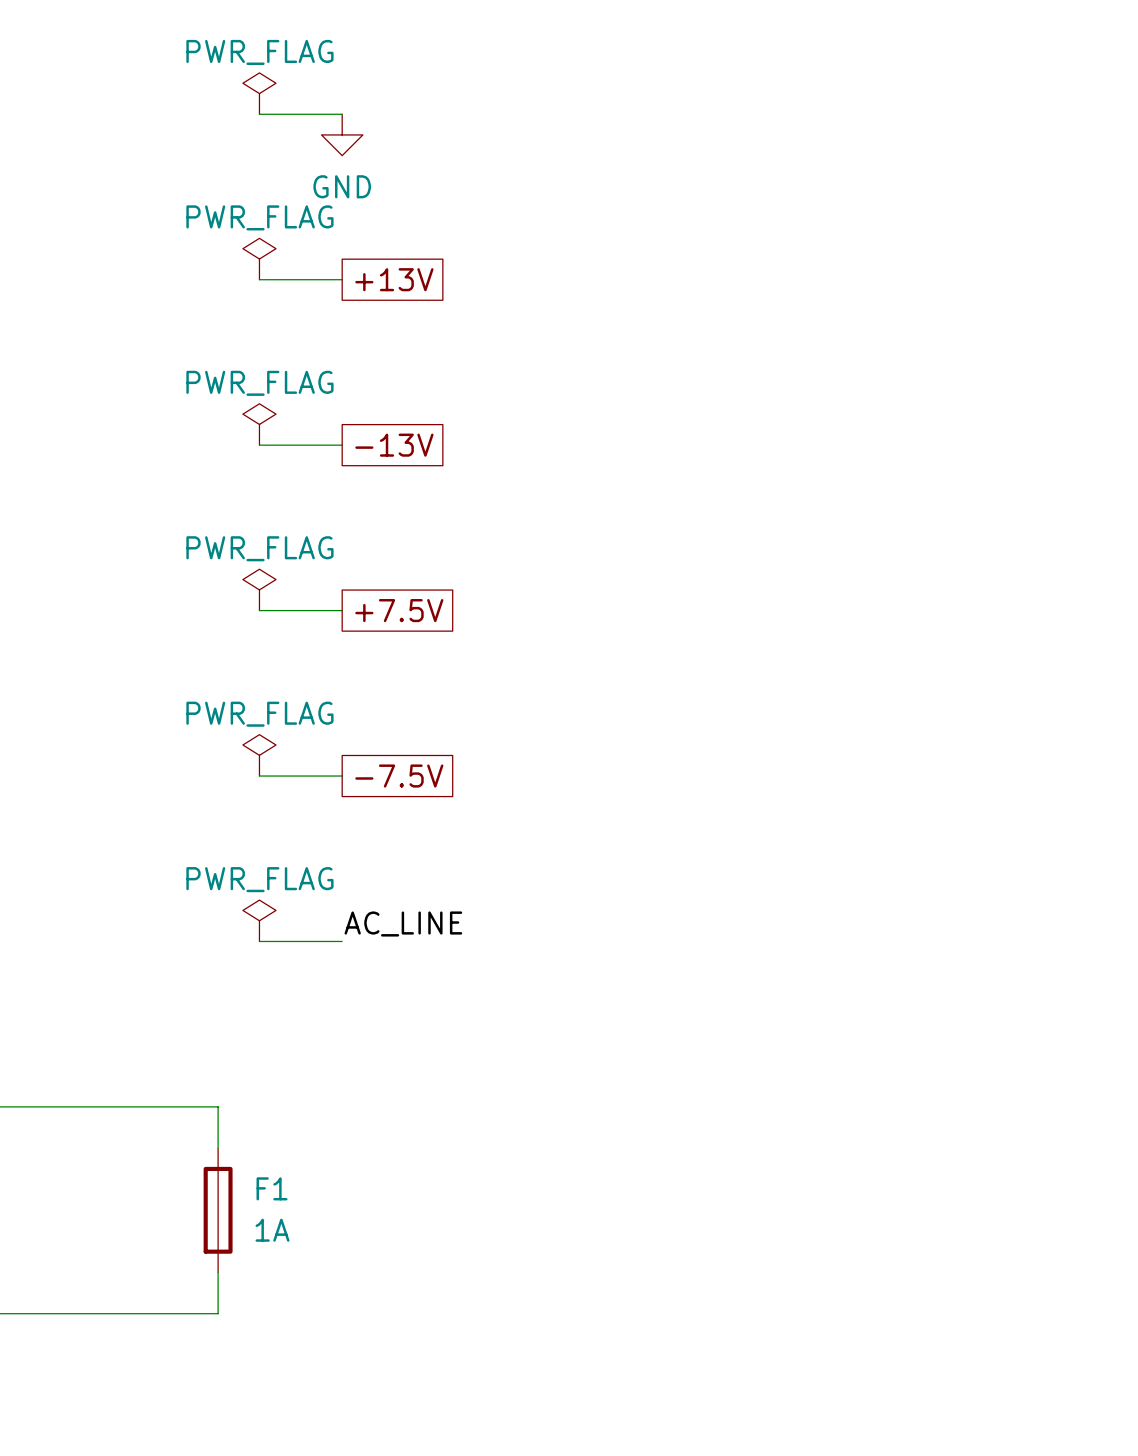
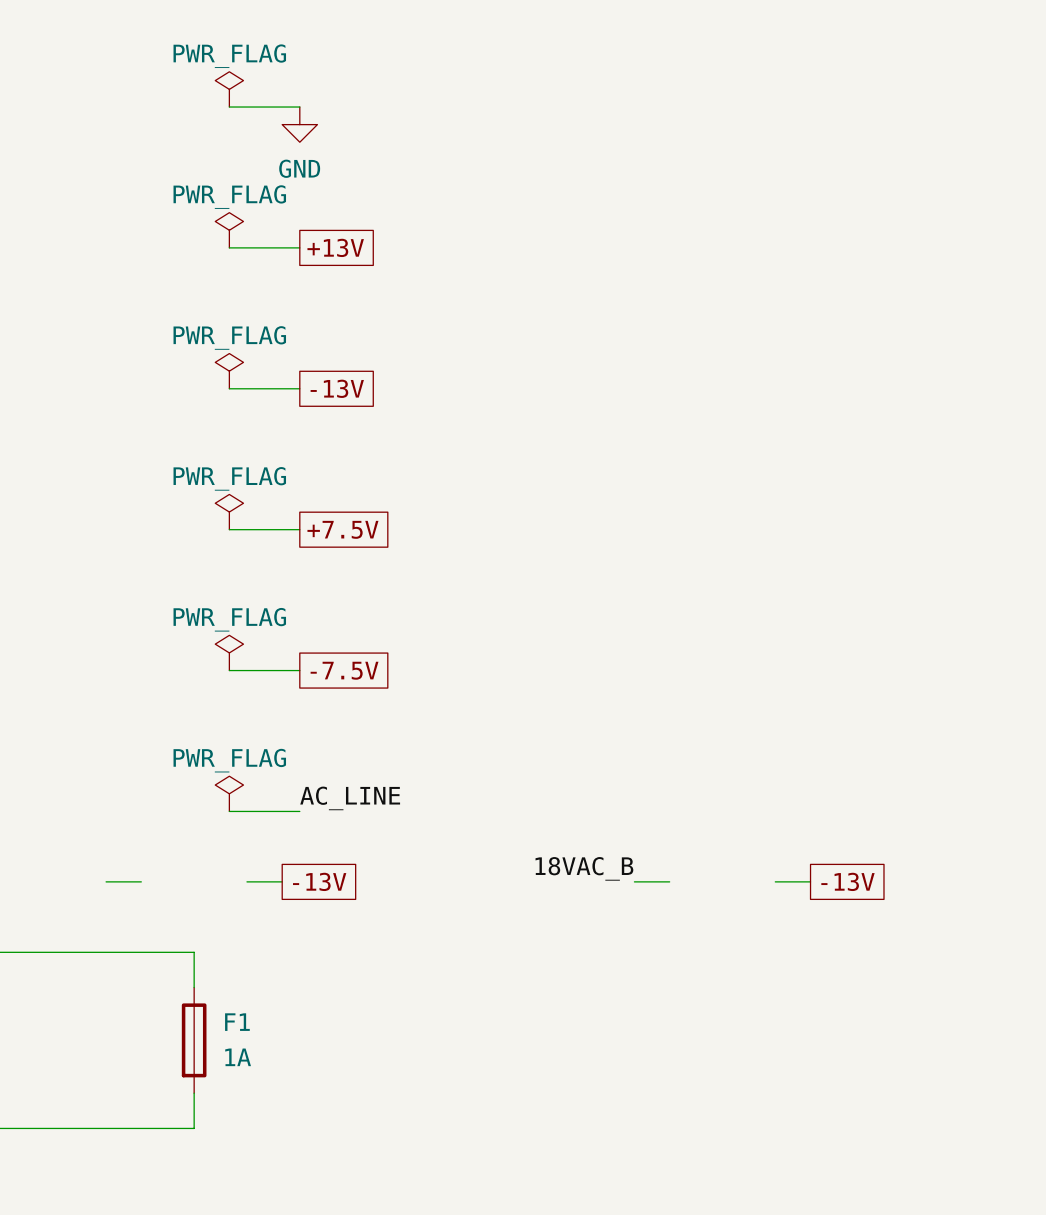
label: none -> 18VAC_B (584, 868)
wire: none -> (106, 881) (141, 881)
wire: none -> (246, 881) (282, 881)
global label: none -> -13V (319, 881)
wire: none -> (634, 881) (669, 881)
wire: none -> (775, 881) (810, 881)
global label: none -> -13V (847, 881)

